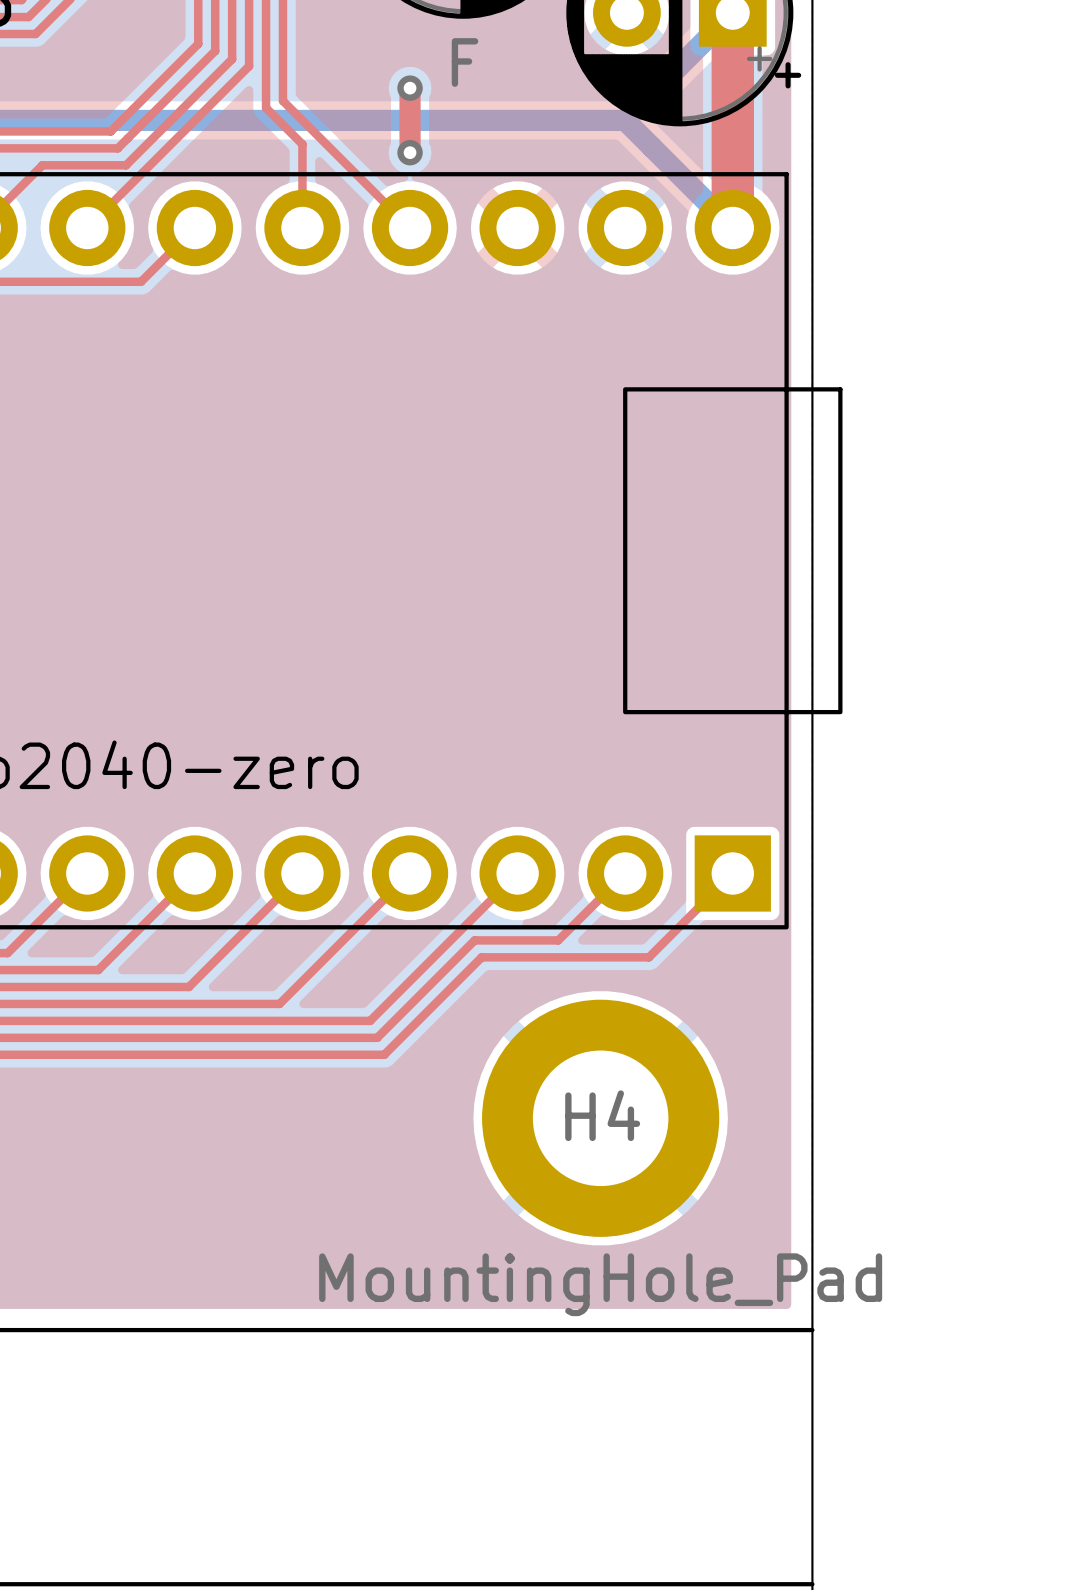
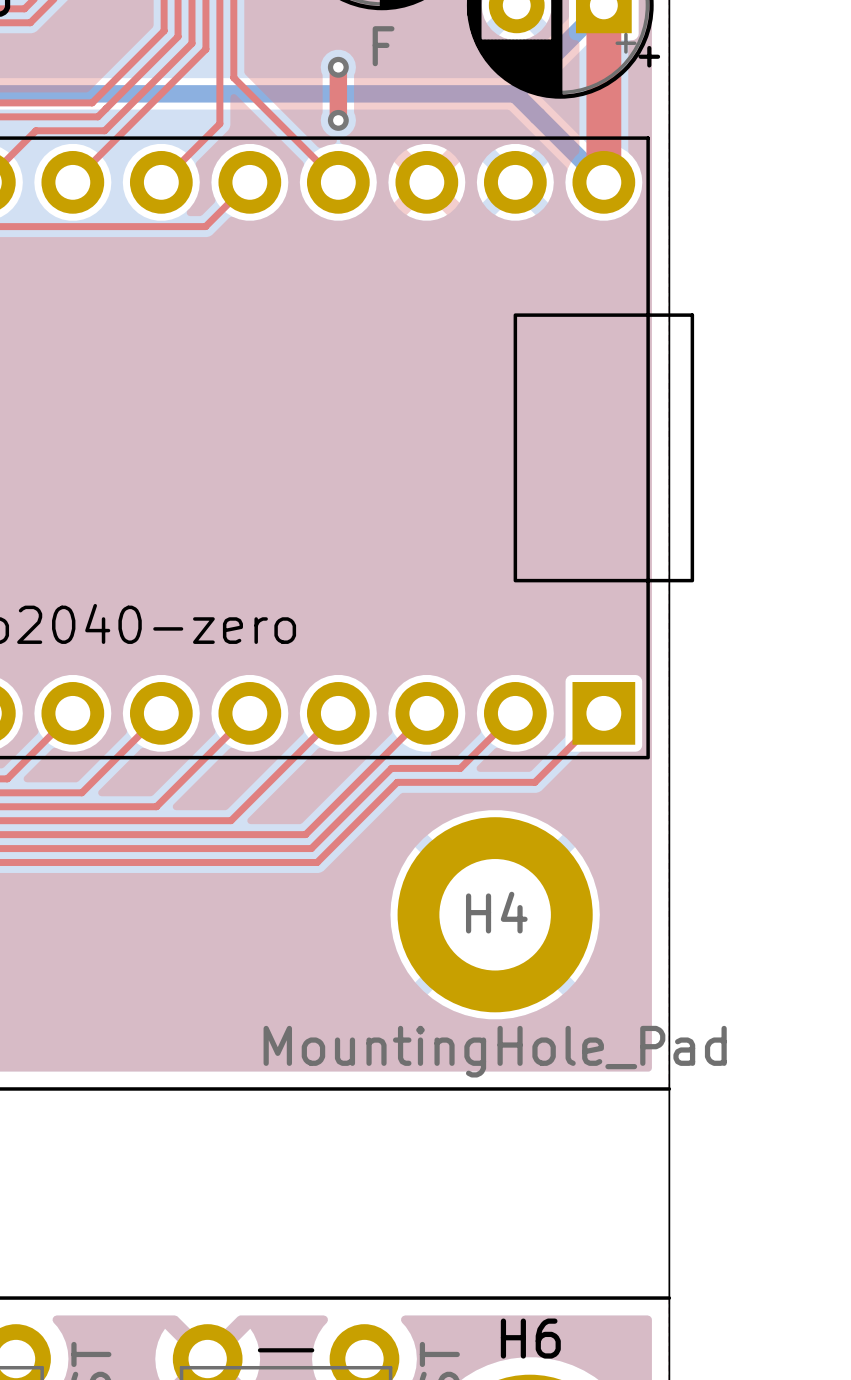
top track: (266, 107) (302, 144) (302, 228) -> (219, 83) (219, 123) (161, 182)
top track: (194, 228) (141, 281) -> (249, 182) (205, 226) (117, 226)

